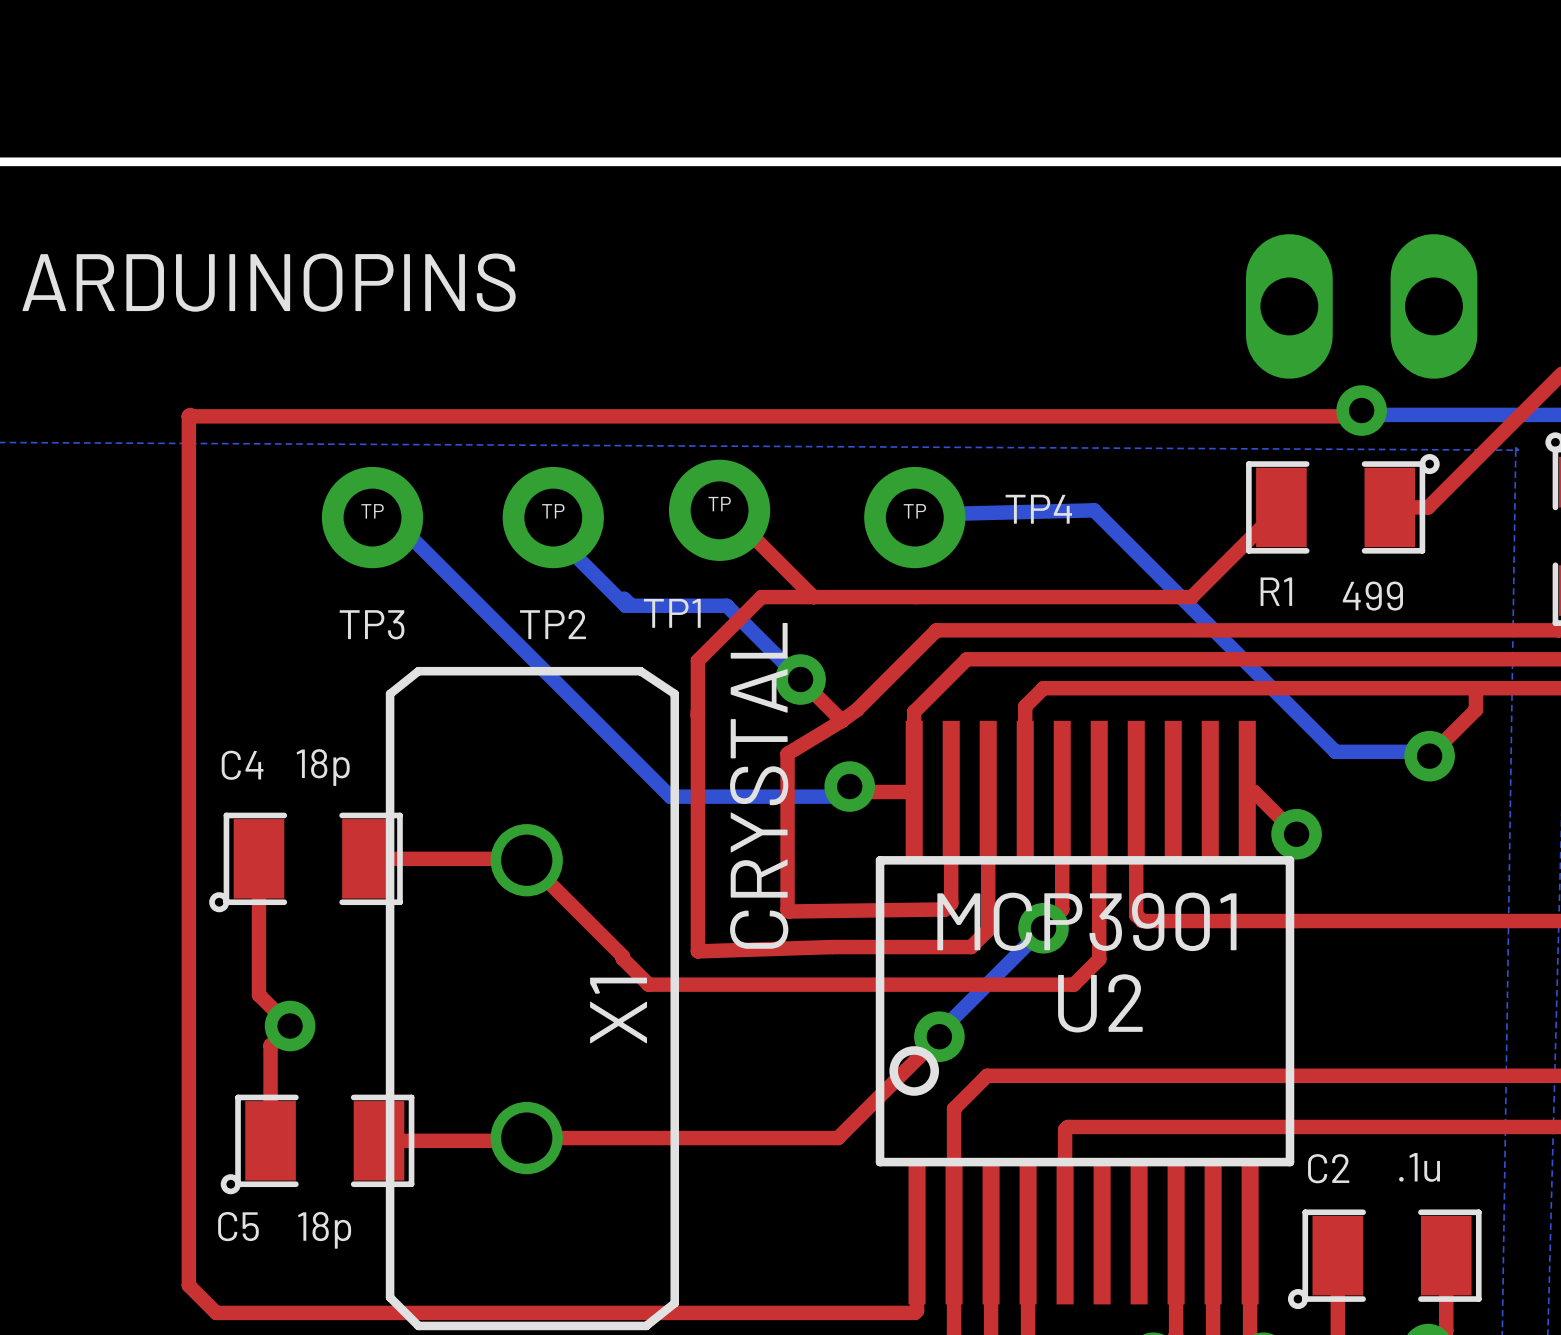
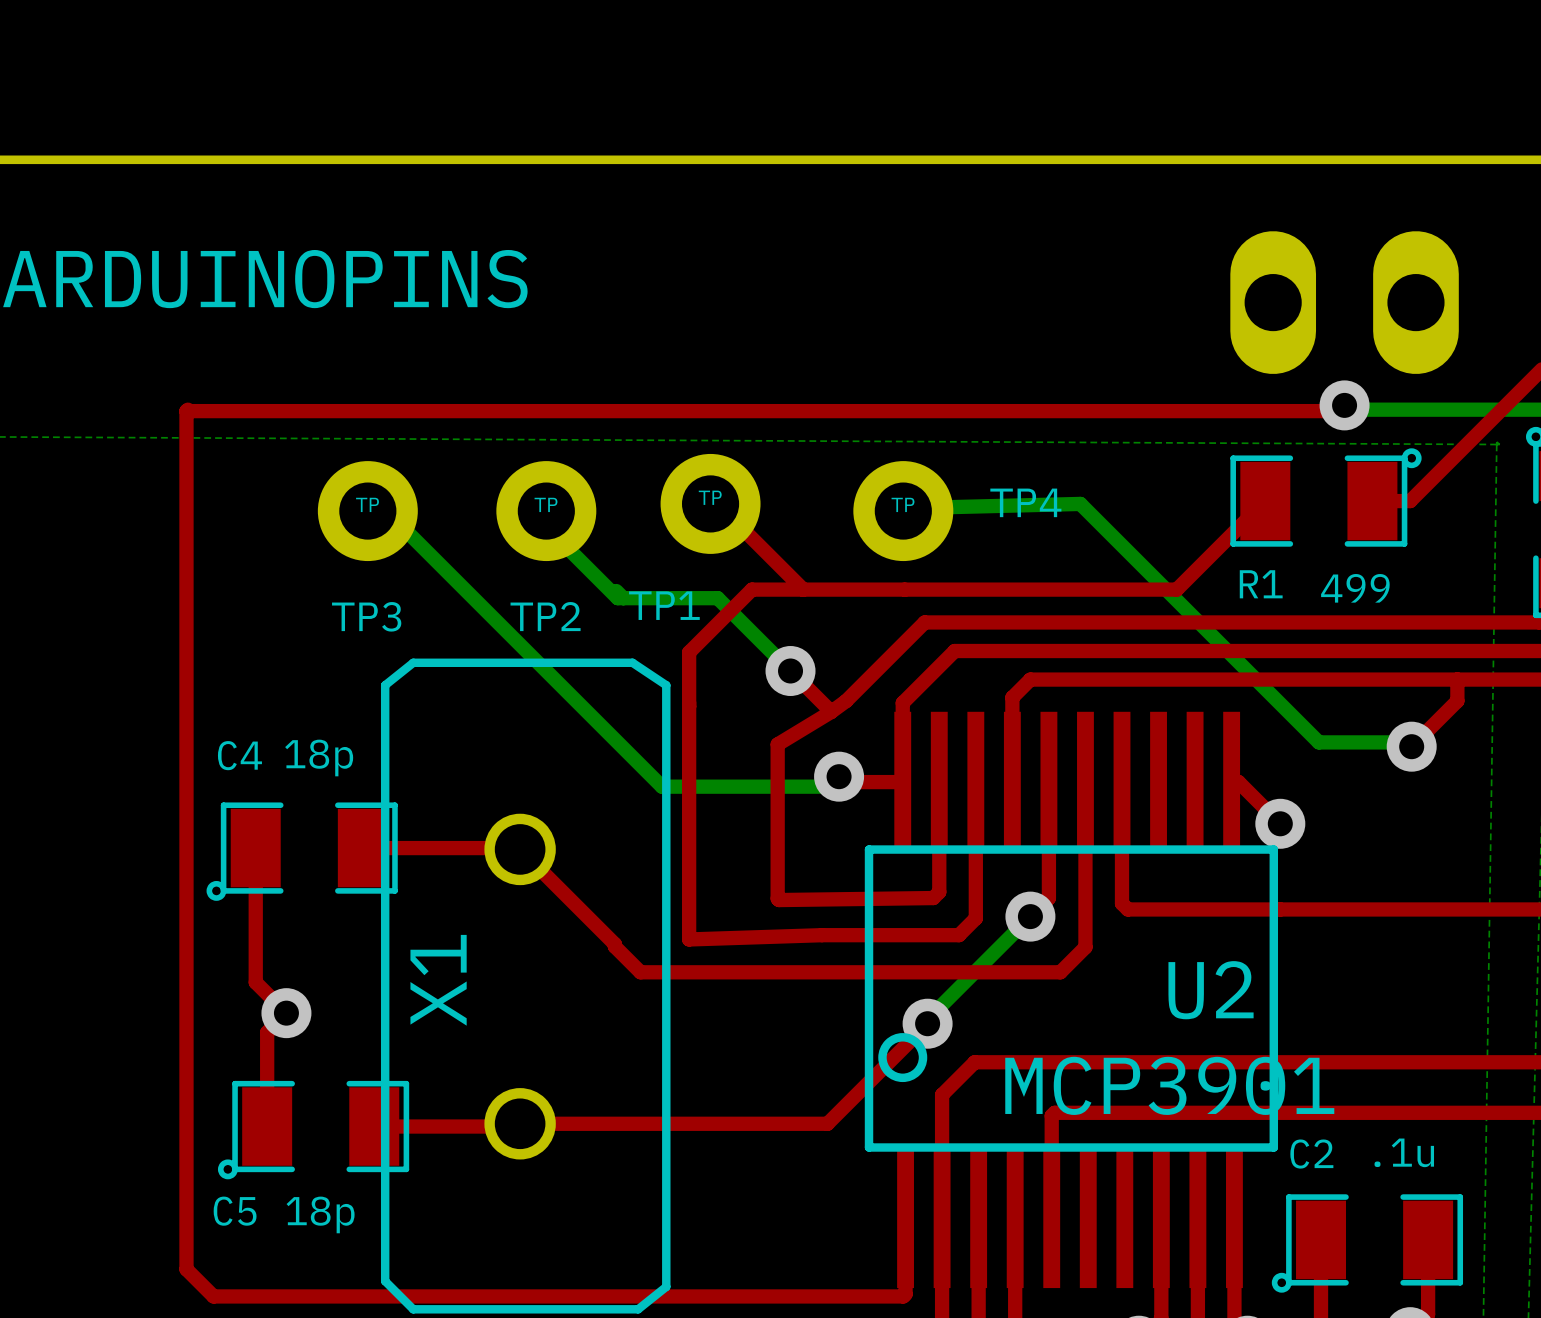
X1 value: CRYSTAL (759, 785) -> none
U2 value position: MCP3901 (1086, 921) -> MCP3901 (1169, 1085)
U2 name position: U2 (1100, 1003) -> U2 (1211, 990)
X1 name position: X1 (618, 1010) -> X1 (438, 980)

